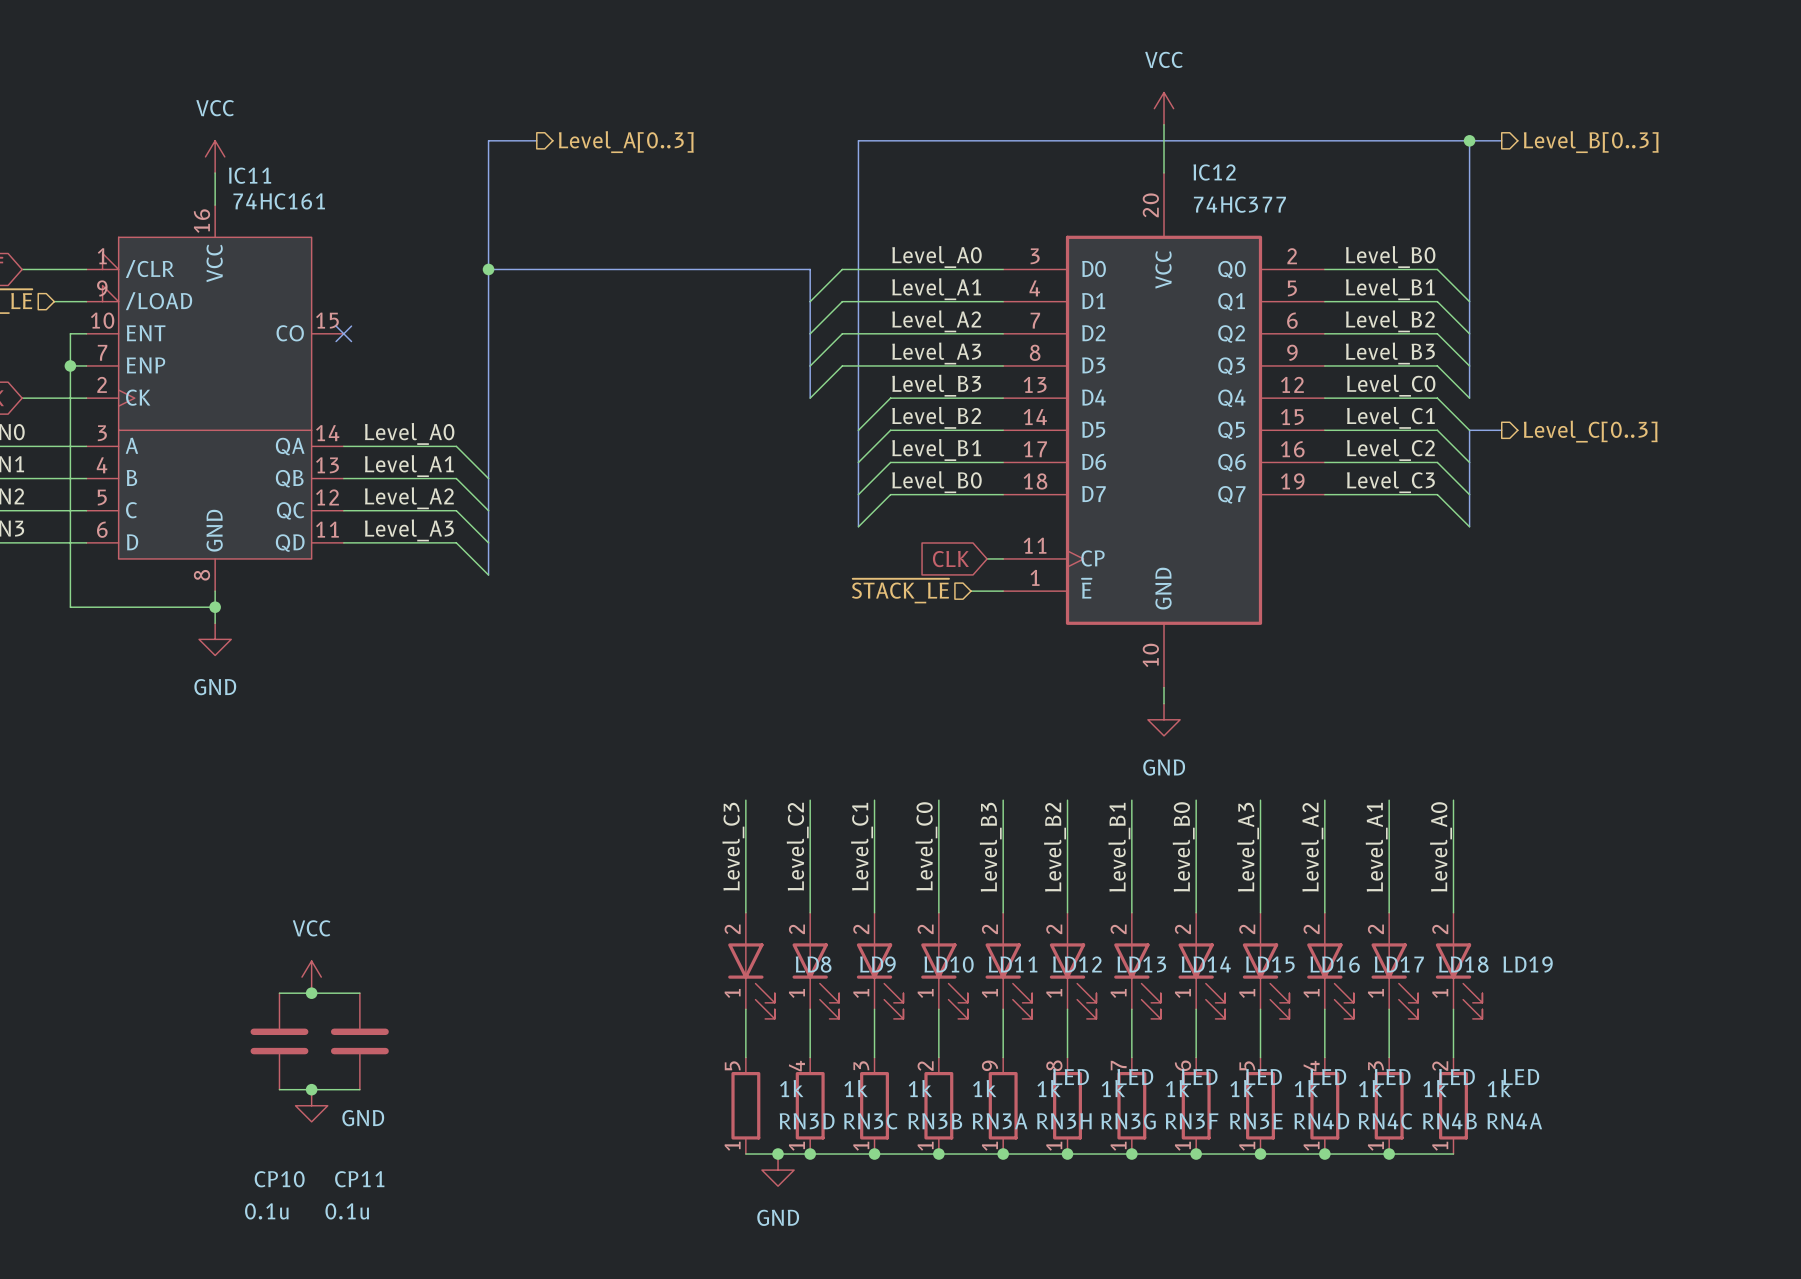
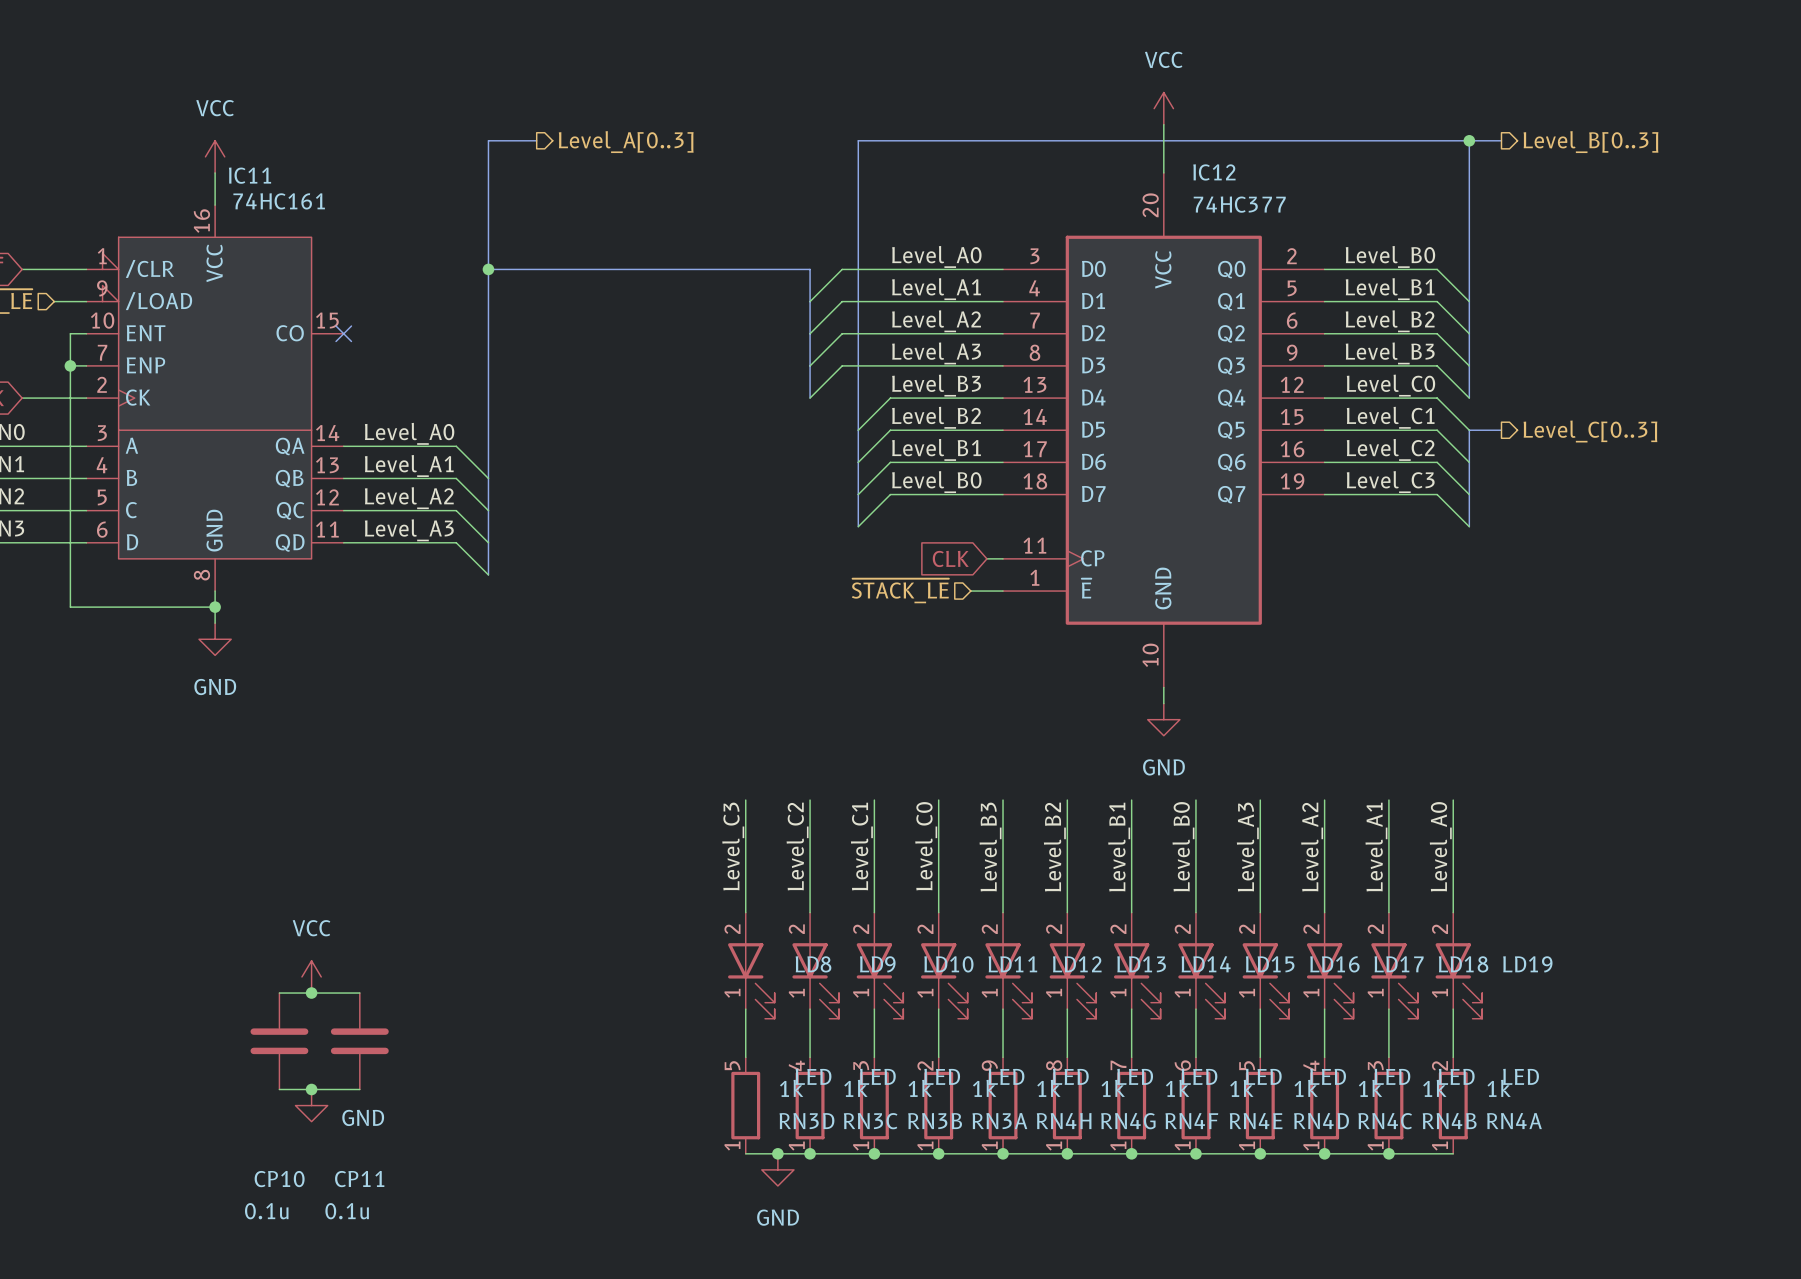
LD8 value: none -> LED (813, 1076)
LD9 value: none -> LED (877, 1076)
LD10 value: none -> LED (942, 1076)
LD11 value: none -> LED (1006, 1076)
RN3H name: RN3H (1064, 1121) -> RN4H (1064, 1121)
RN3G name: RN3G (1128, 1121) -> RN4G (1128, 1121)
RN3F name: RN3F (1192, 1121) -> RN4F (1191, 1121)
RN3E name: RN3E (1256, 1121) -> RN4E (1256, 1121)

